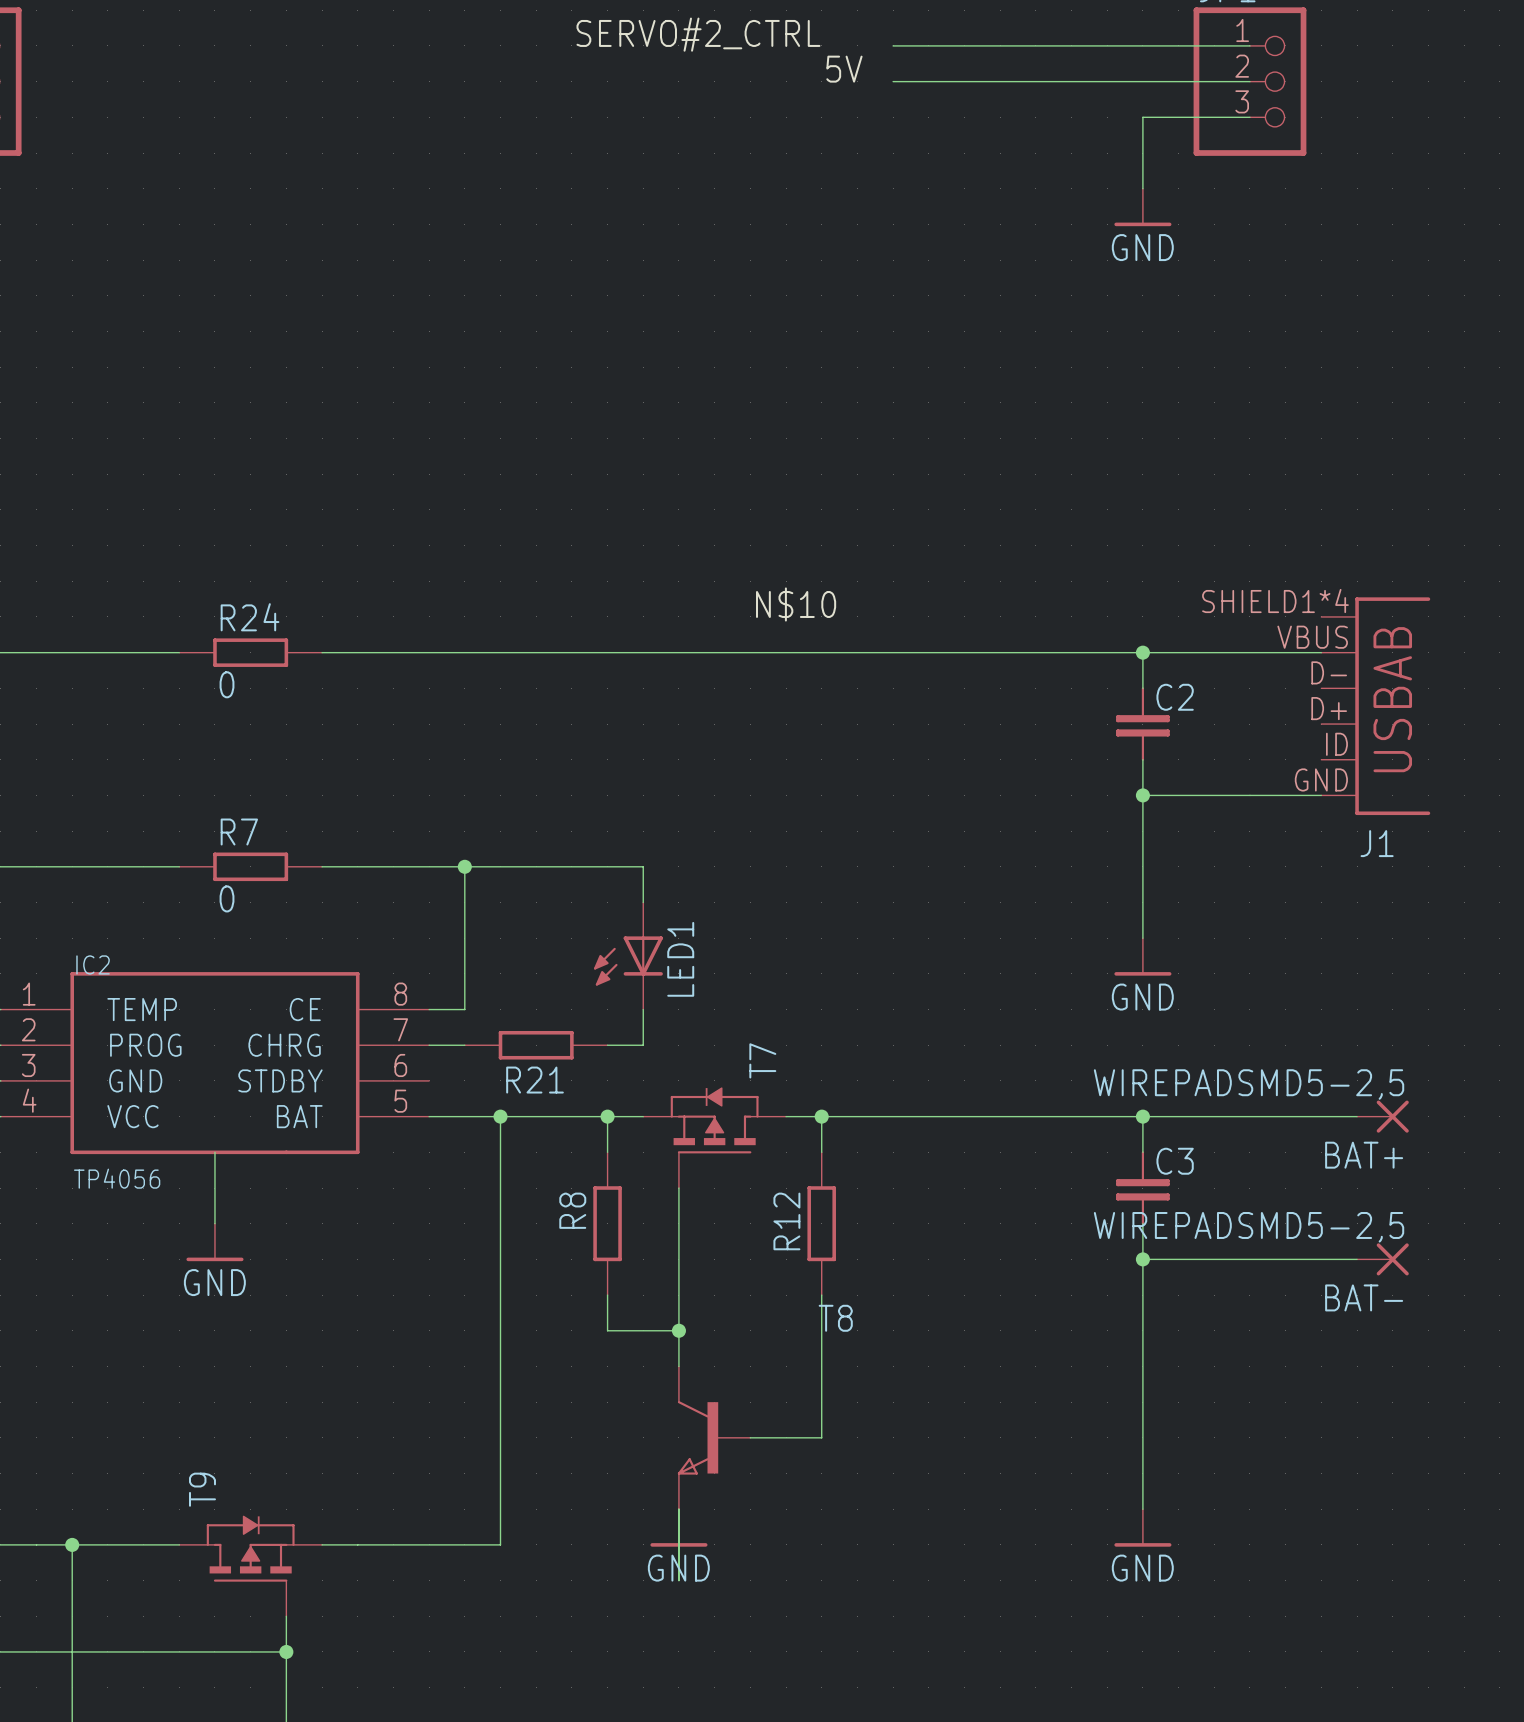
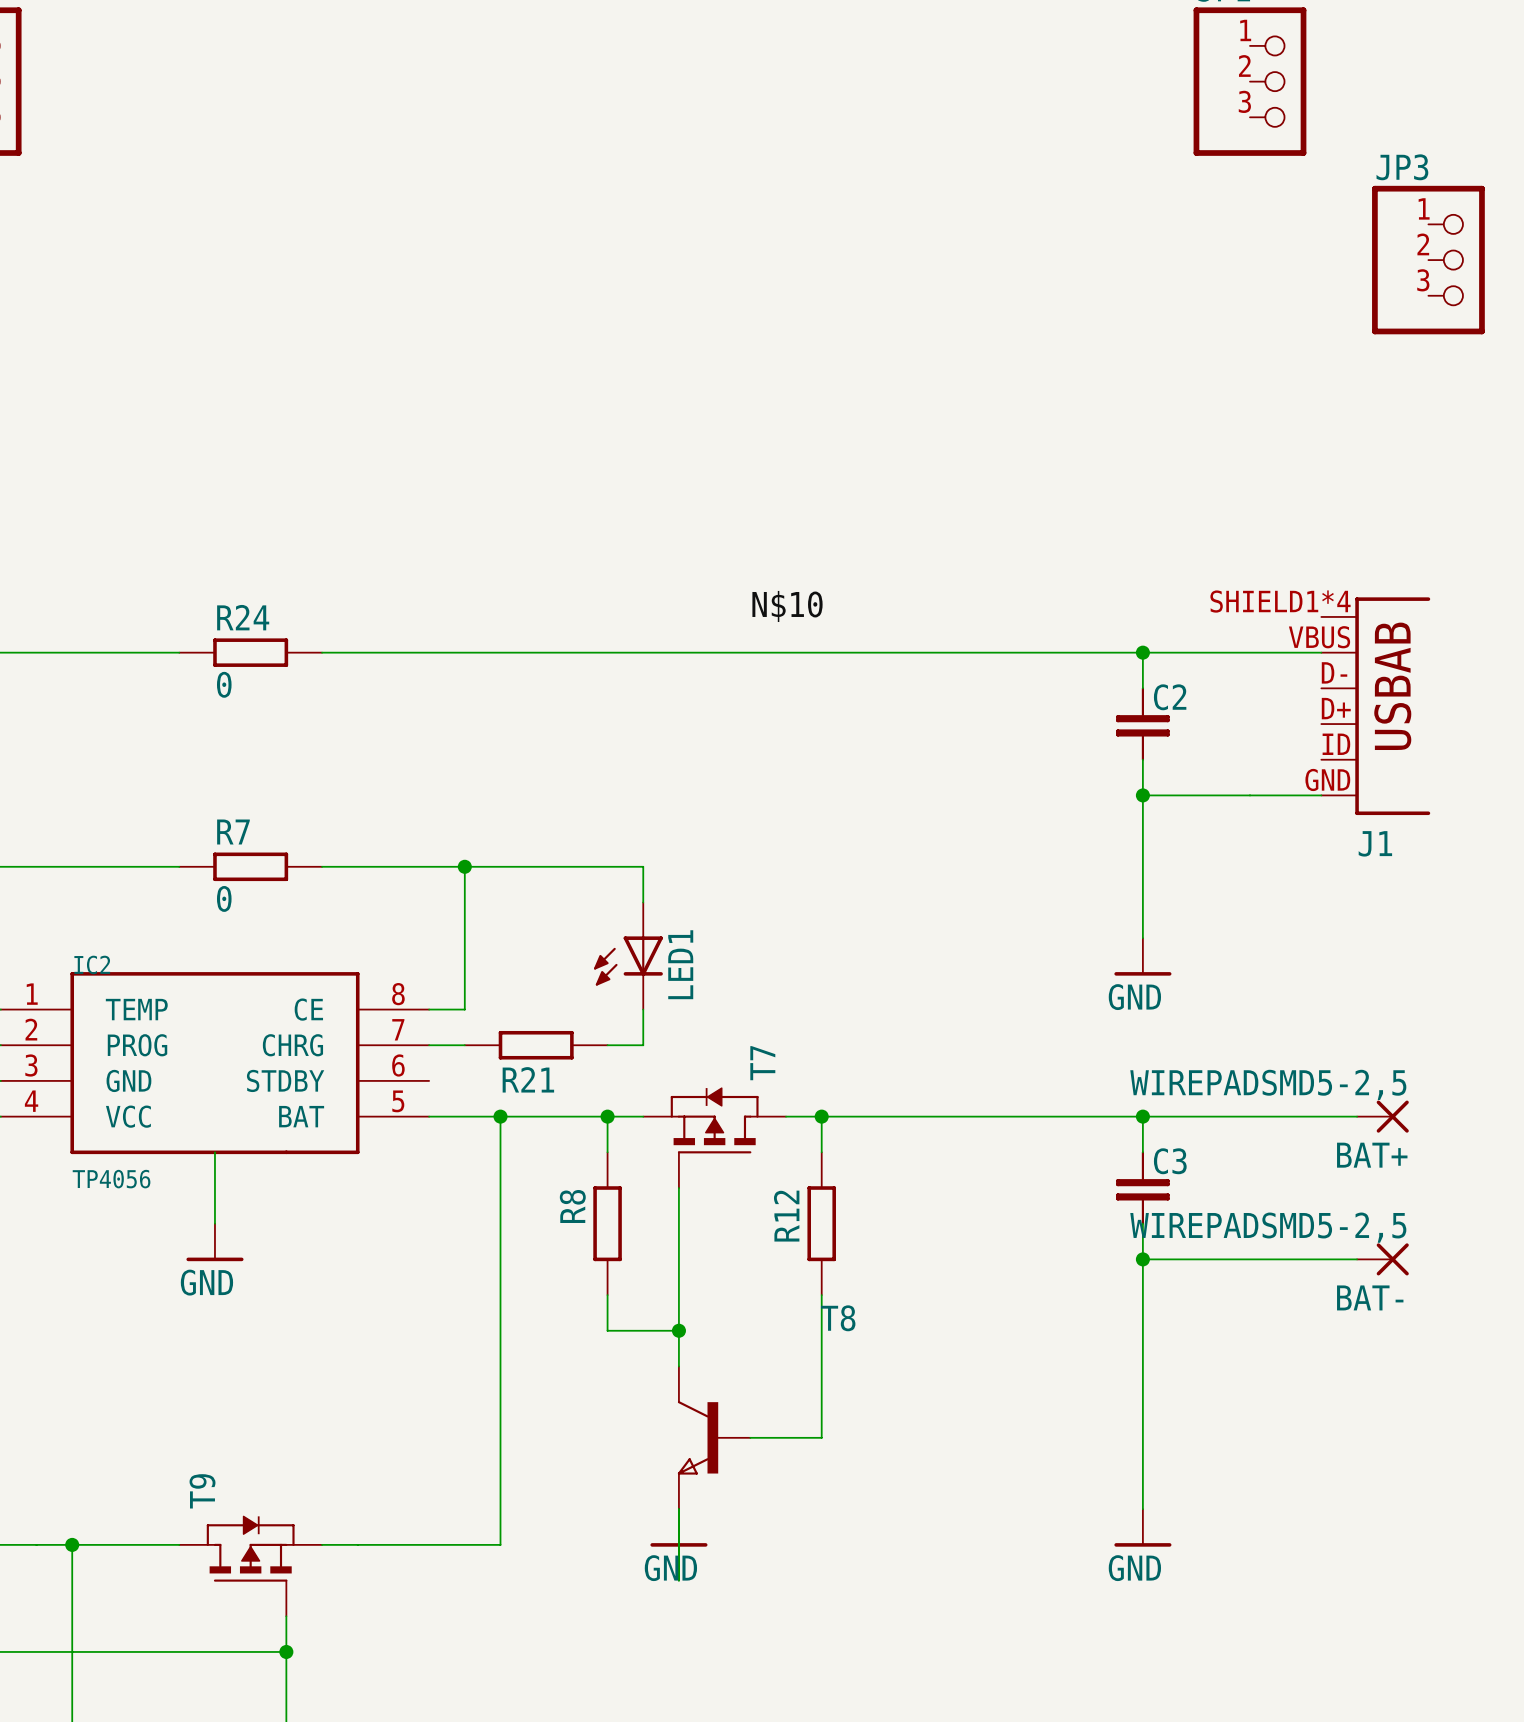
label: SERVO#2_CTRL (698, 34) -> none
wire: (893, 45) (1249, 45) -> none
label: 5V (844, 69) -> none
wire: (893, 81) (1249, 81) -> none
wire: (1249, 117) (1142, 117) (1142, 188) -> none
power symbol: GND (1142, 207) -> none
JP3: none -> (1428, 260)

